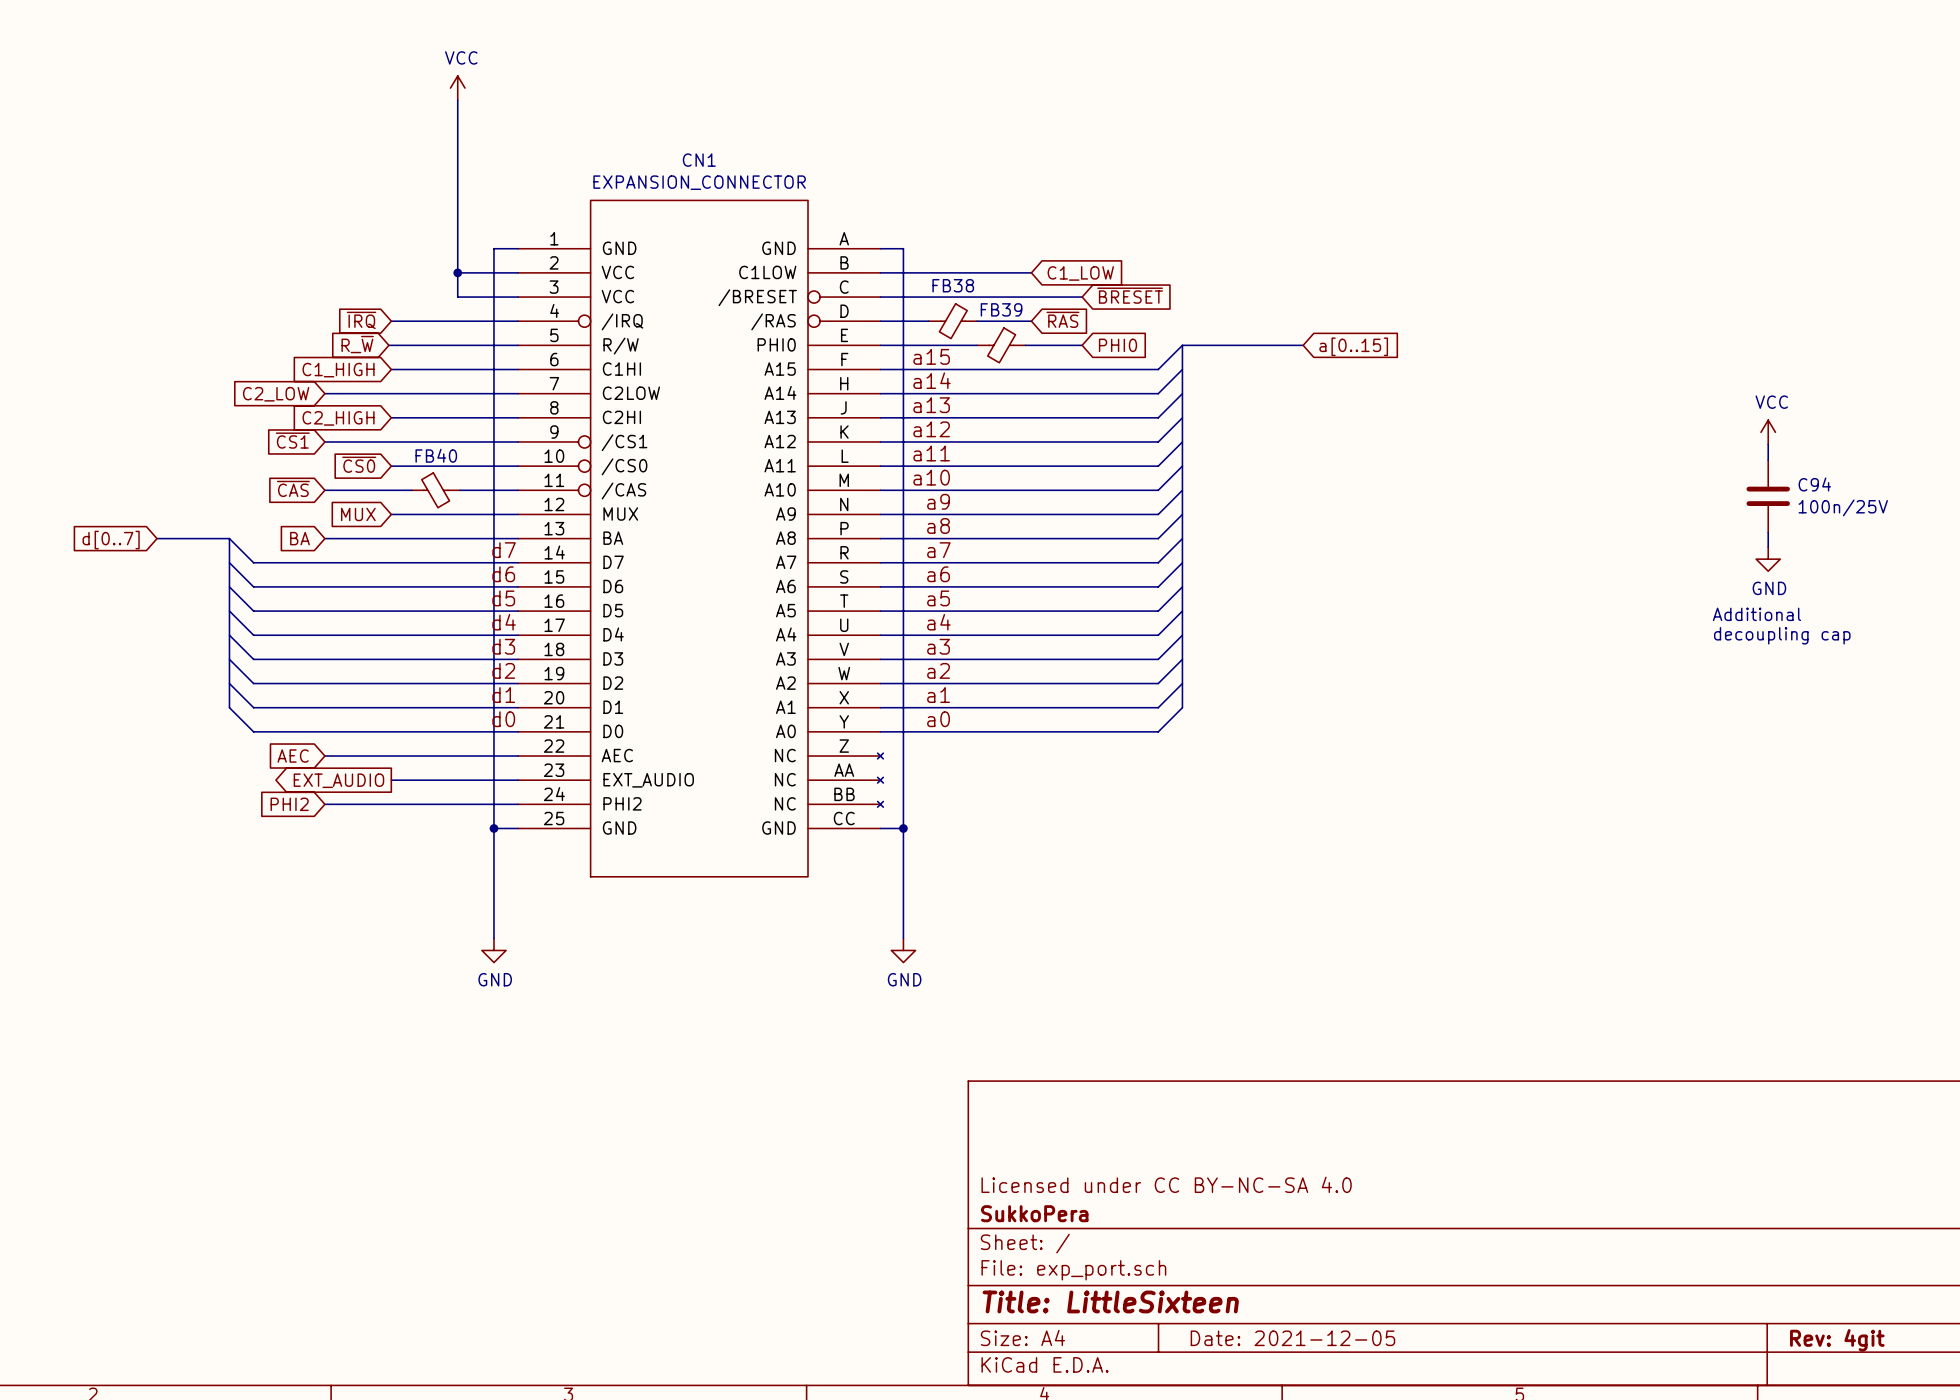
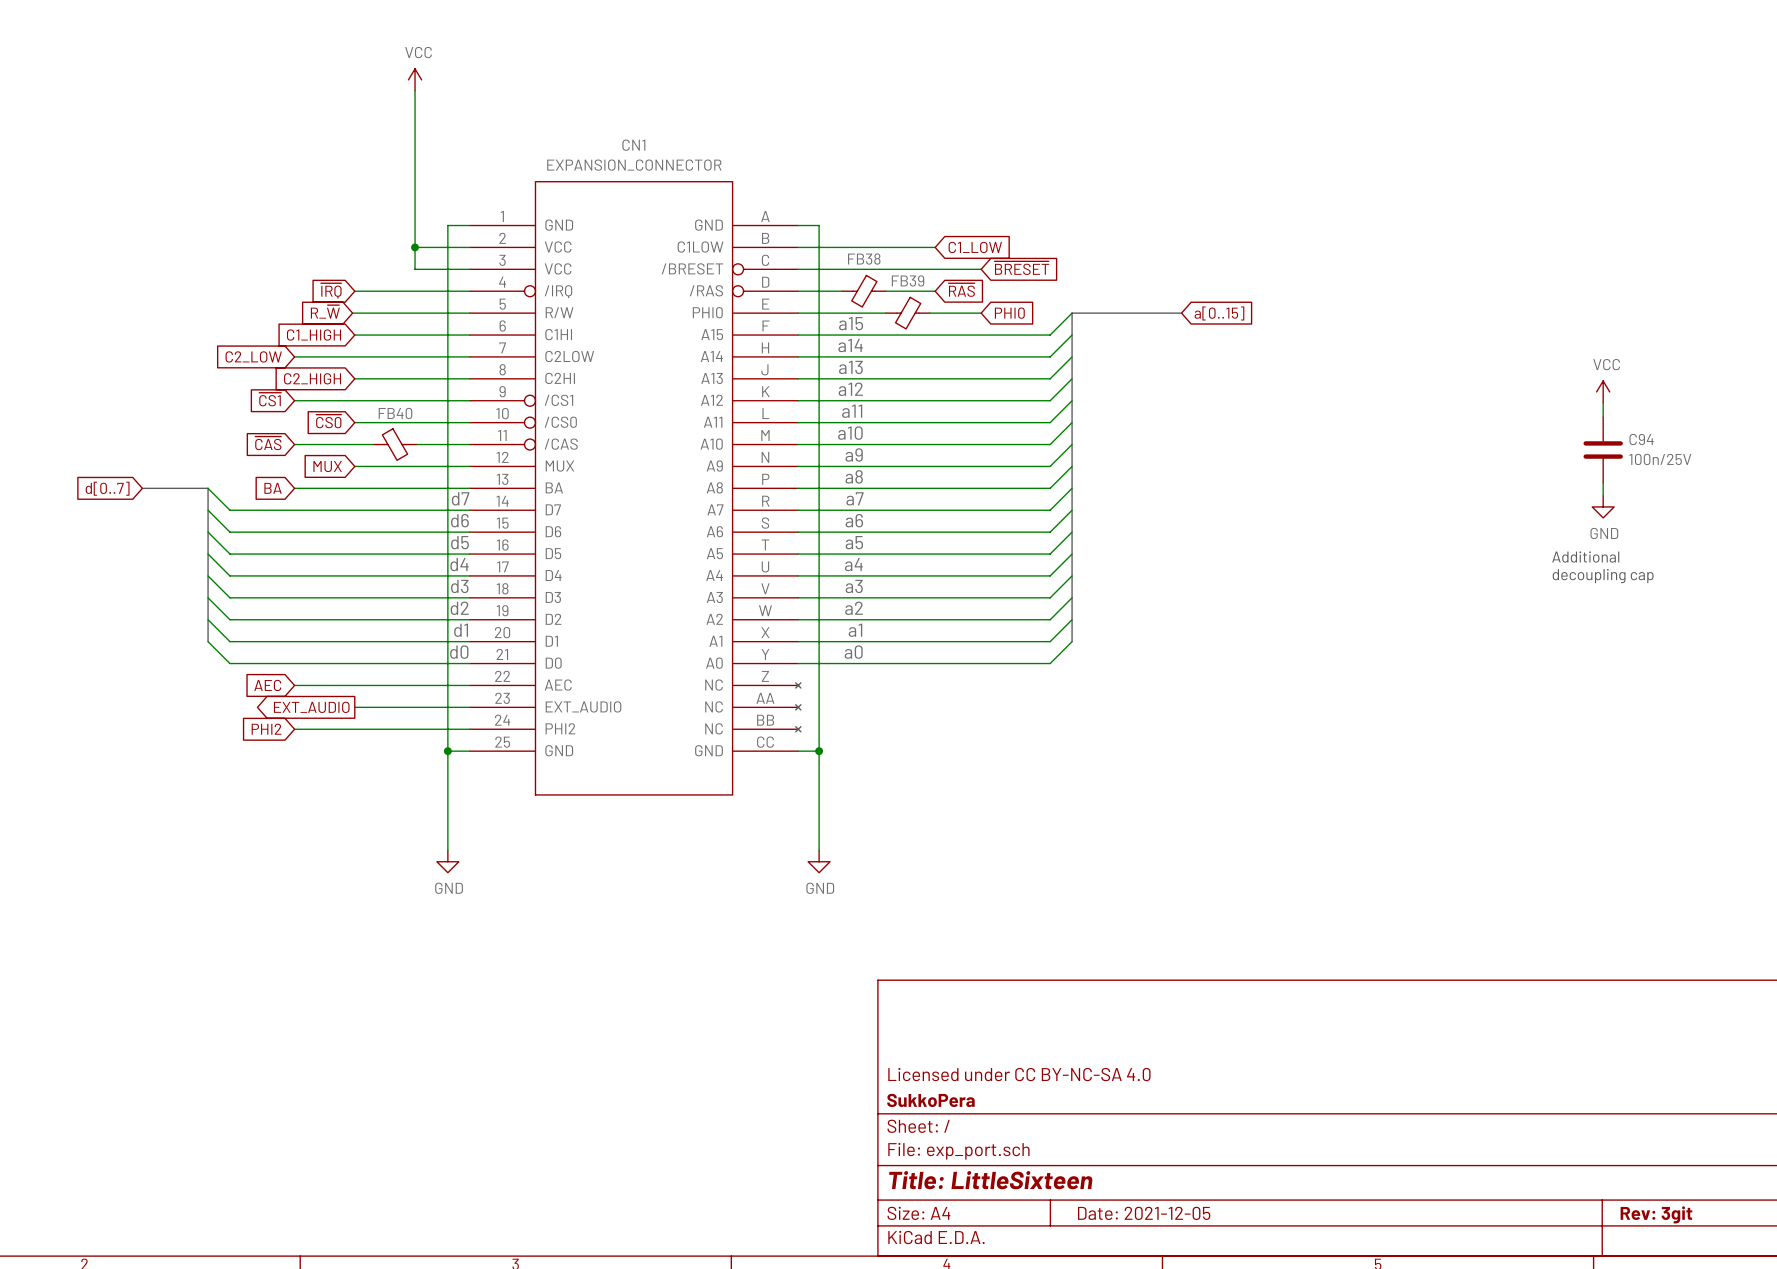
title block: Rev: 4git (1837, 1340) -> Rev: 3git (1656, 1214)

